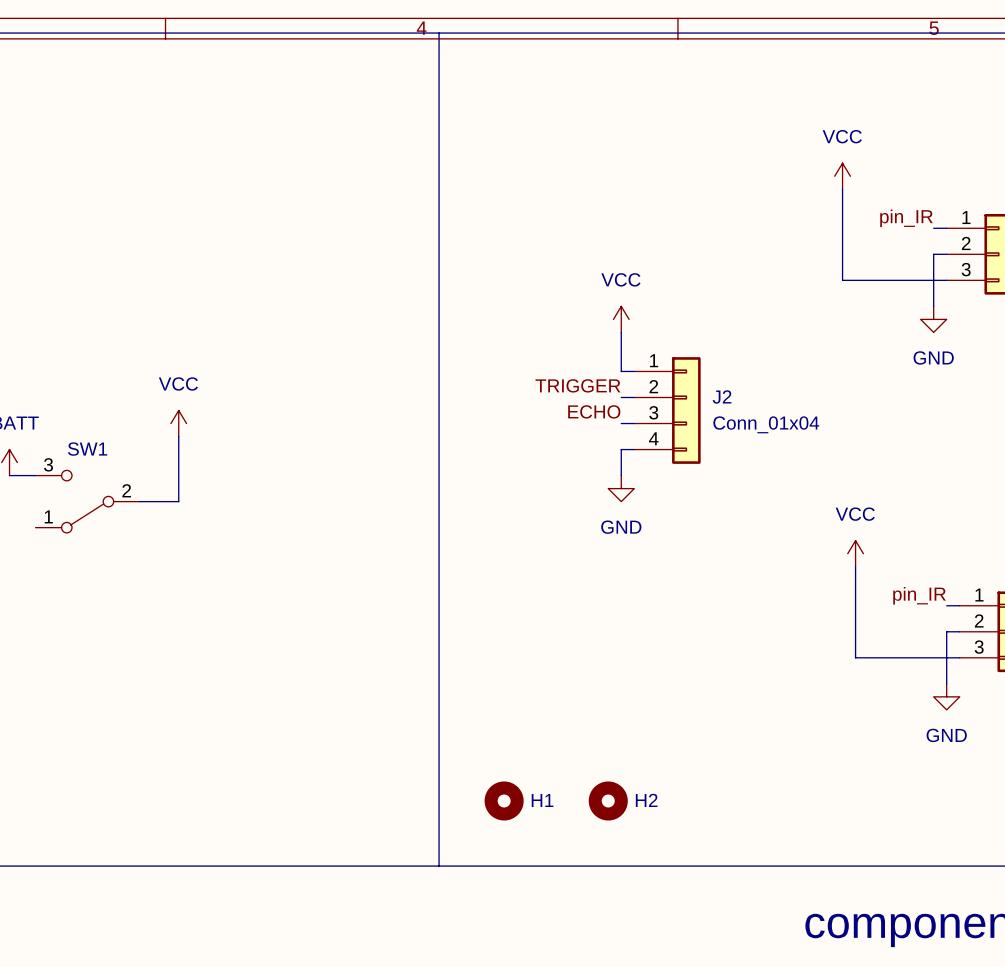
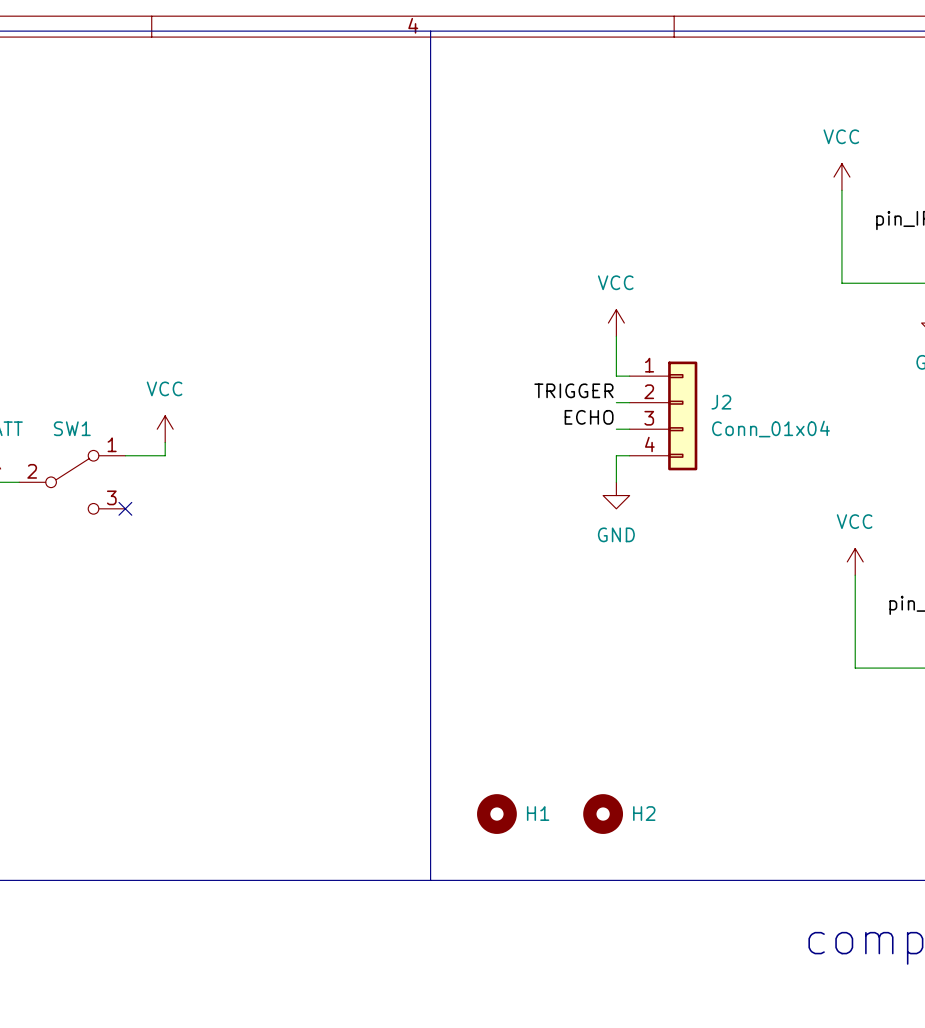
wire: (178, 449) (178, 501) (139, 501) -> (165, 455) (125, 455)
SW1 rotation: 0° (87, 501) -> 180° (72, 482)
no-connect mark: none -> (125, 508)

